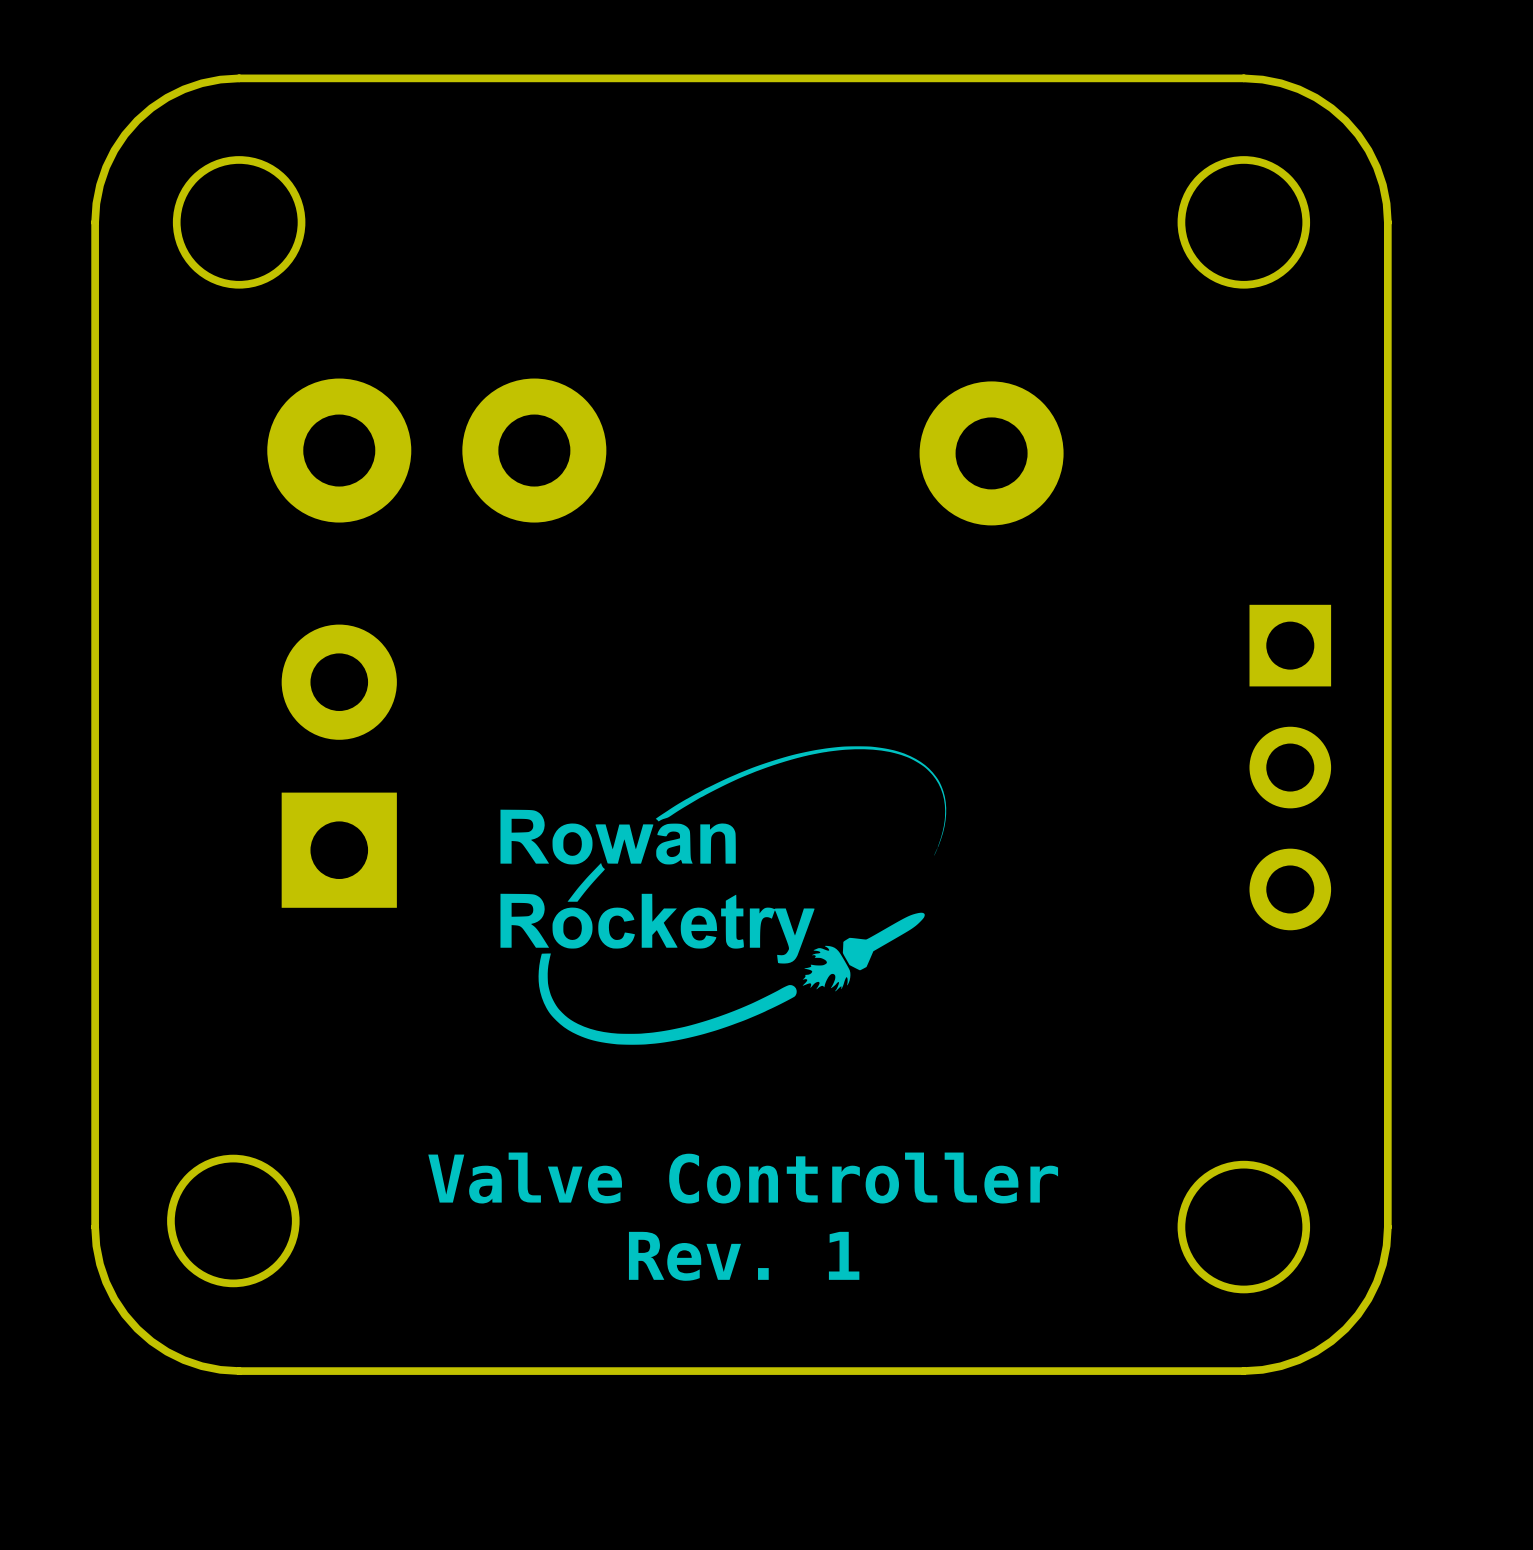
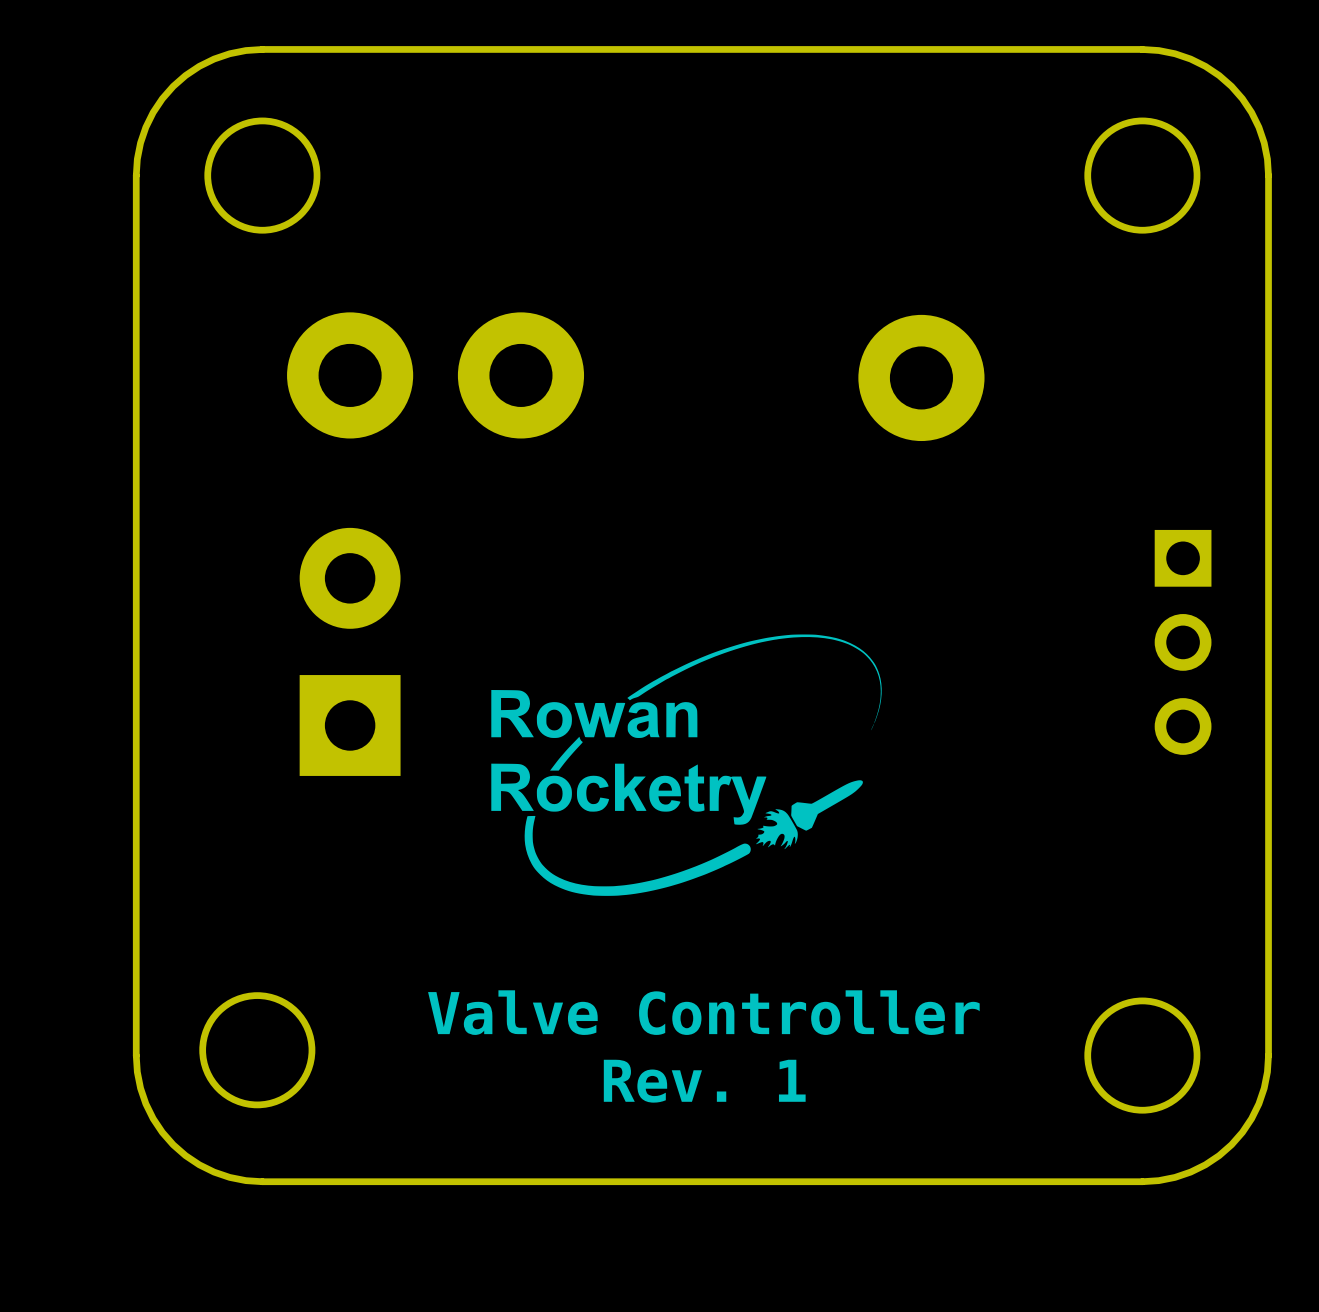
part footprint: [1249, 604, 1332, 931] -> [1154, 529, 1212, 755]

